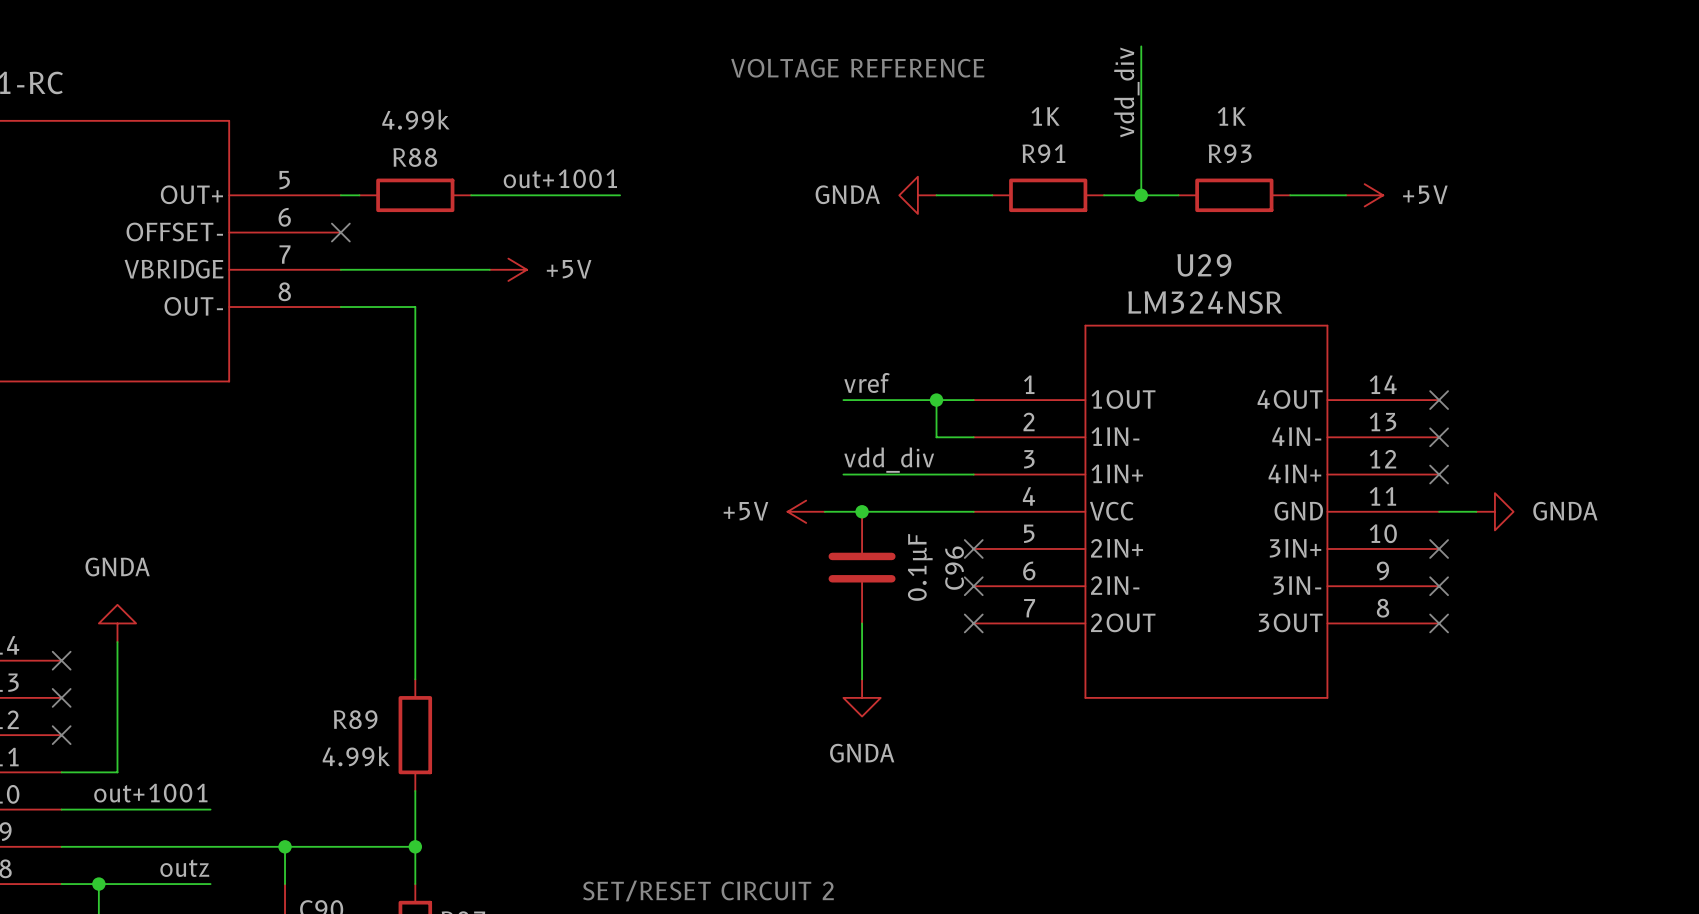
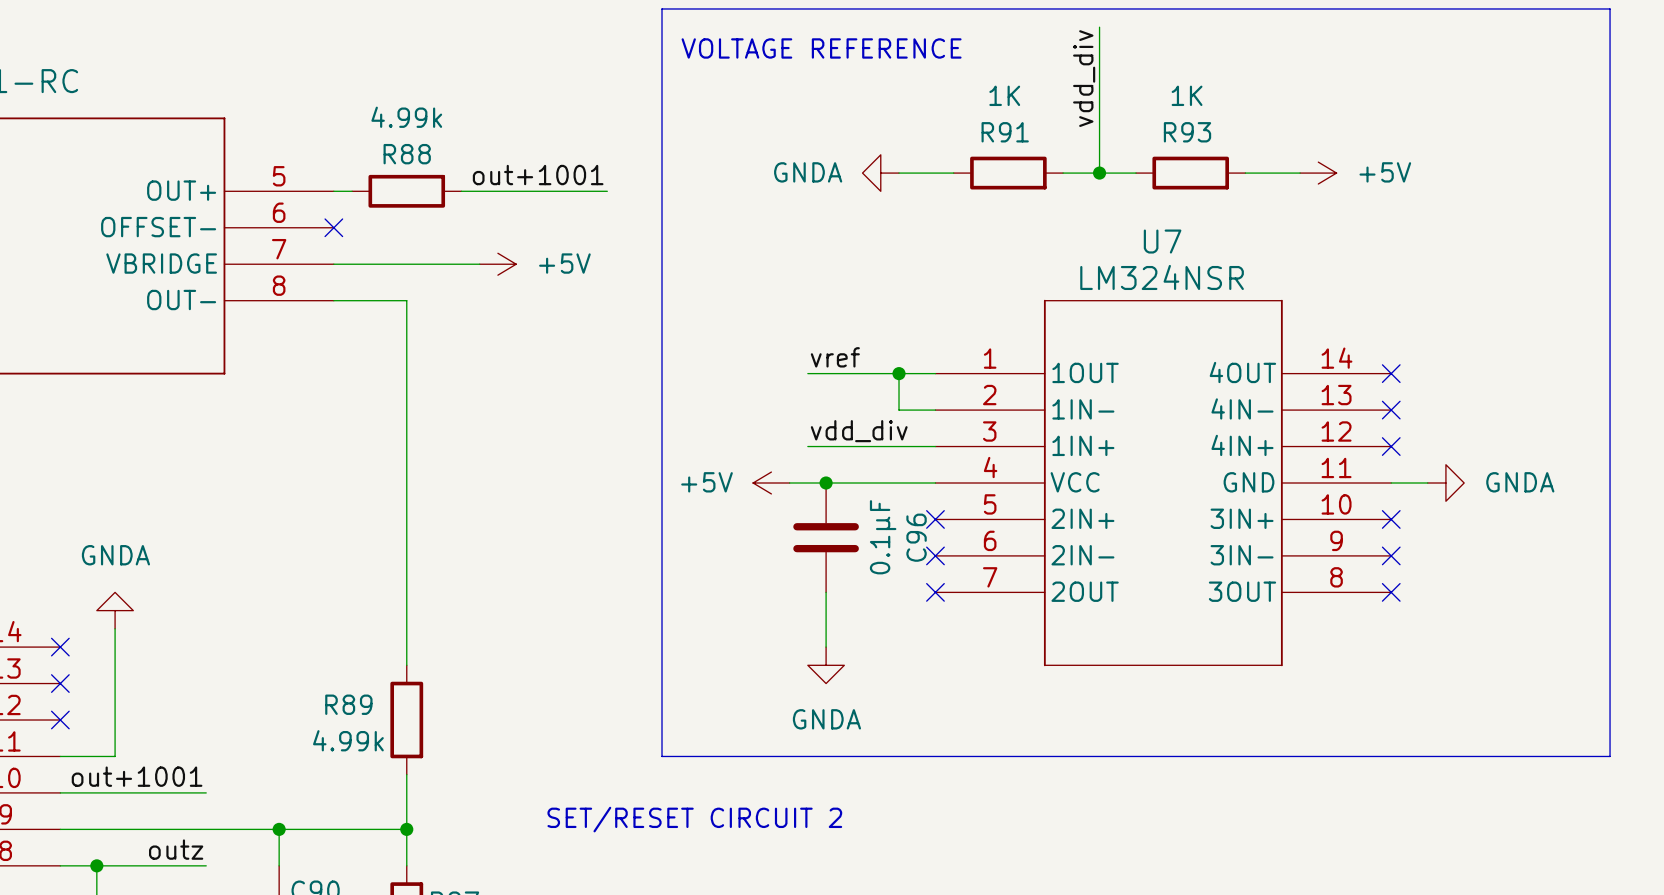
line: none -> (662, 8) (1610, 8) (1610, 756) (662, 756) (662, 8)
wire: (1141, 46) (1141, 195) -> (1099, 27) (1099, 173)
text position: VOLTAGE REFERENCE (857, 68) -> VOLTAGE REFERENCE (821, 48)
label position: vdd_div (1126, 92) -> vdd_div (1084, 78)
power symbol position: GNDA (917, 195) -> GNDA (880, 173)
wire: (936, 195) (992, 195) -> (899, 173) (953, 173)
R91 position: (1048, 195) -> (1008, 173)
wire: (1104, 195) (1178, 195) -> (1063, 173) (1136, 173)
junction position: (1141, 195) -> (1099, 173)
R93 position: (1234, 195) -> (1190, 173)
wire: (1290, 195) (1346, 195) -> (1245, 173) (1300, 173)
power symbol position: +5V (1364, 195) -> +5V (1318, 173)
no-connect mark: none -> (1391, 373)
label position: vref (867, 383) -> vref (835, 357)
wire: (843, 400) (973, 400) -> (807, 373) (935, 373)
wire: (936, 400) (936, 437) (973, 437) -> (899, 373) (899, 410) (935, 410)
junction position: (936, 400) -> (899, 373)
no-connect mark: (1439, 400) -> none
no-connect mark: none -> (1391, 410)
no-connect mark: (1439, 437) -> none
no-connect mark: none -> (1391, 446)
label position: vdd_div (889, 460) -> vdd_div (859, 431)
wire: (843, 474) (973, 474) -> (807, 446) (935, 446)
no-connect mark: (1439, 474) -> none
U7: none -> LM324NSR (1163, 483)
power symbol position: +5V (806, 511) -> +5V (771, 483)
wire: (824, 511) (973, 511) -> (789, 483) (935, 483)
junction position: (862, 511) -> (826, 483)
U29: LM324NSR (1206, 511) -> none
wire: (1439, 511) (1476, 511) -> (1391, 483) (1427, 483)
power symbol position: GNDA (1494, 511) -> GNDA (1445, 483)
no-connect mark: none -> (935, 519)
no-connect mark: none -> (1391, 519)
no-connect mark: (973, 548) -> none
no-connect mark: (1439, 548) -> none
C96 position: (862, 567) -> (826, 537)
no-connect mark: none -> (935, 555)
no-connect mark: none -> (1391, 555)
no-connect mark: (973, 586) -> none
no-connect mark: (1439, 586) -> none
no-connect mark: none -> (935, 592)
no-connect mark: none -> (1391, 592)
wire: (862, 623) (862, 679) -> (826, 592) (826, 647)
no-connect mark: (973, 623) -> none
no-connect mark: (1439, 623) -> none
power symbol position: GNDA (862, 697) -> GNDA (826, 665)
text position: SET/RESET CIRCUIT 2 (708, 890) -> SET/RESET CIRCUIT 2 (694, 819)

